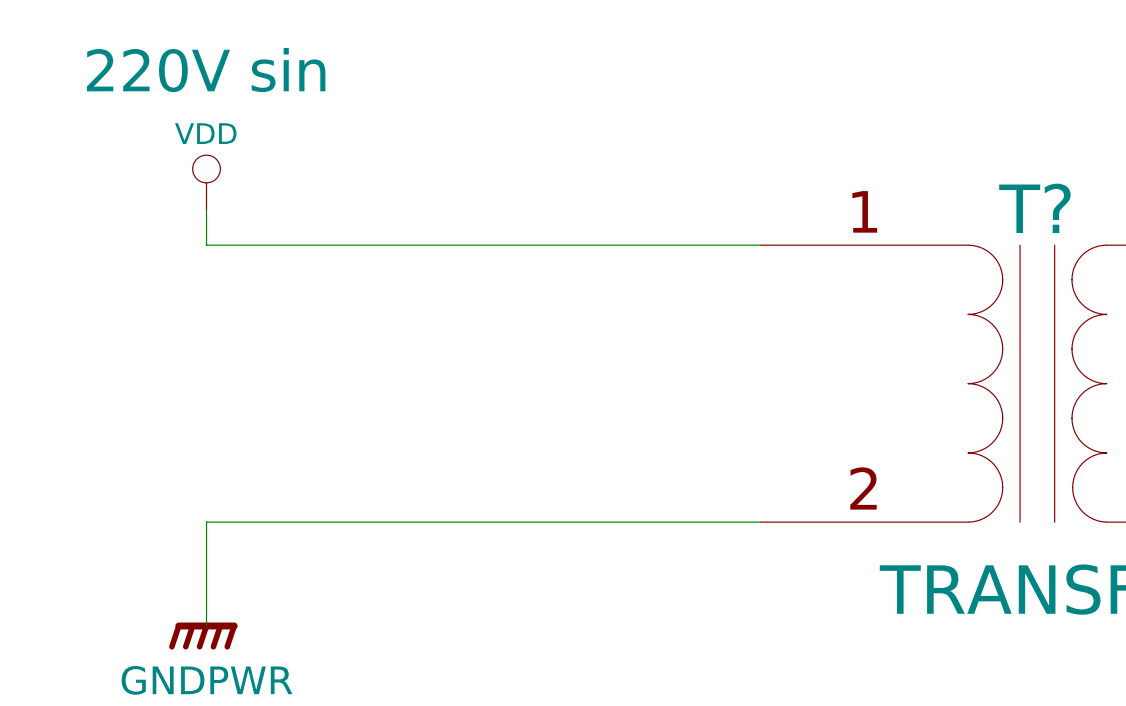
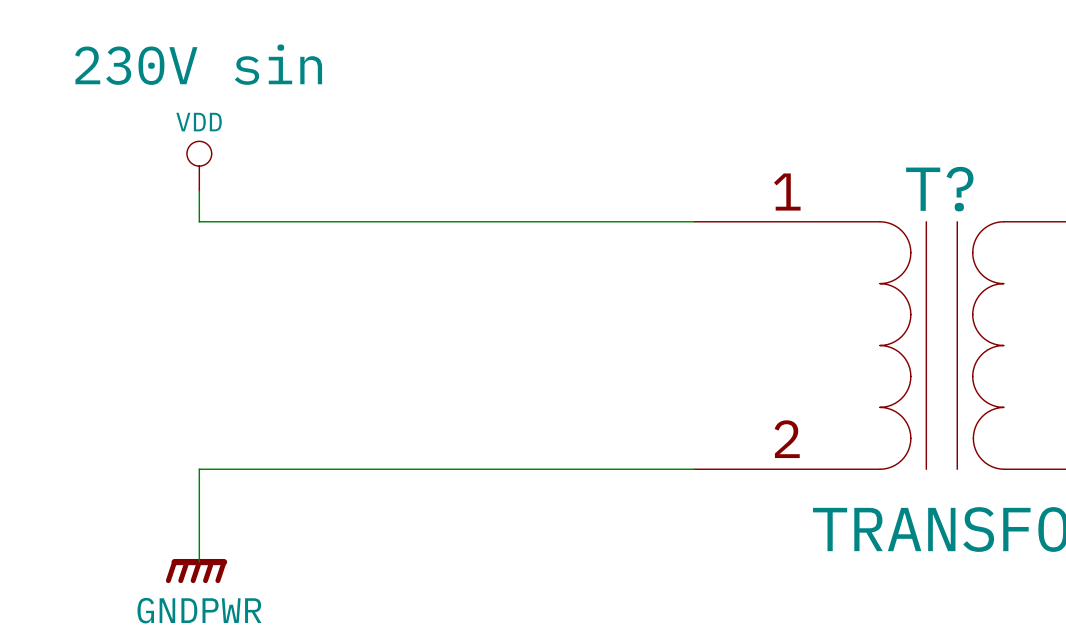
power symbol text: 220V sin (206, 70) -> 230V sin (198, 64)

